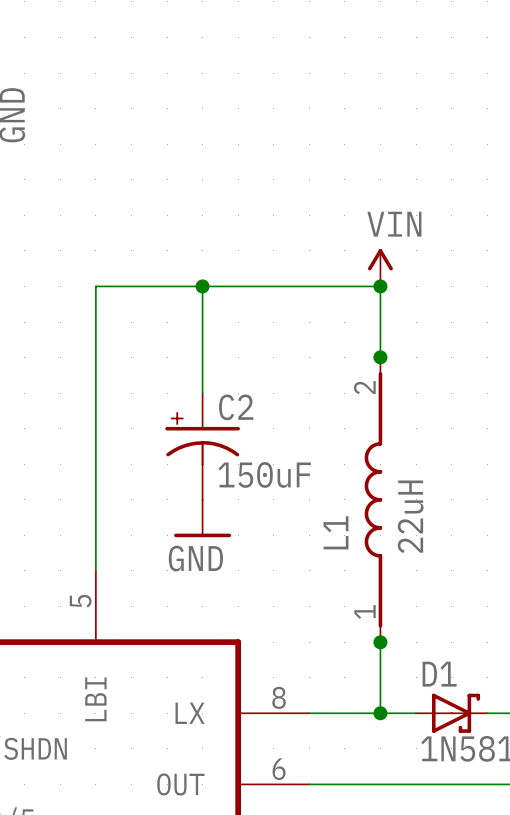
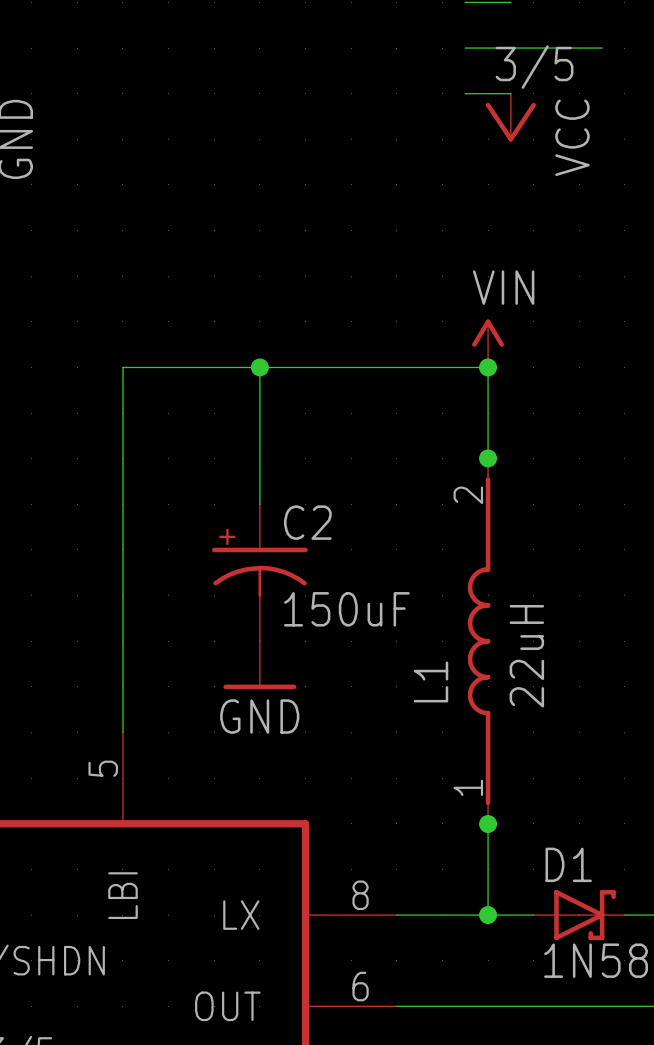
wire: none -> (465, 2) (510, 2)
wire: none -> (465, 48) (602, 48)
label: none -> 3/5 (534, 67)
wire: none -> (465, 93) (510, 93)
power symbol: none -> VCC (510, 117)

